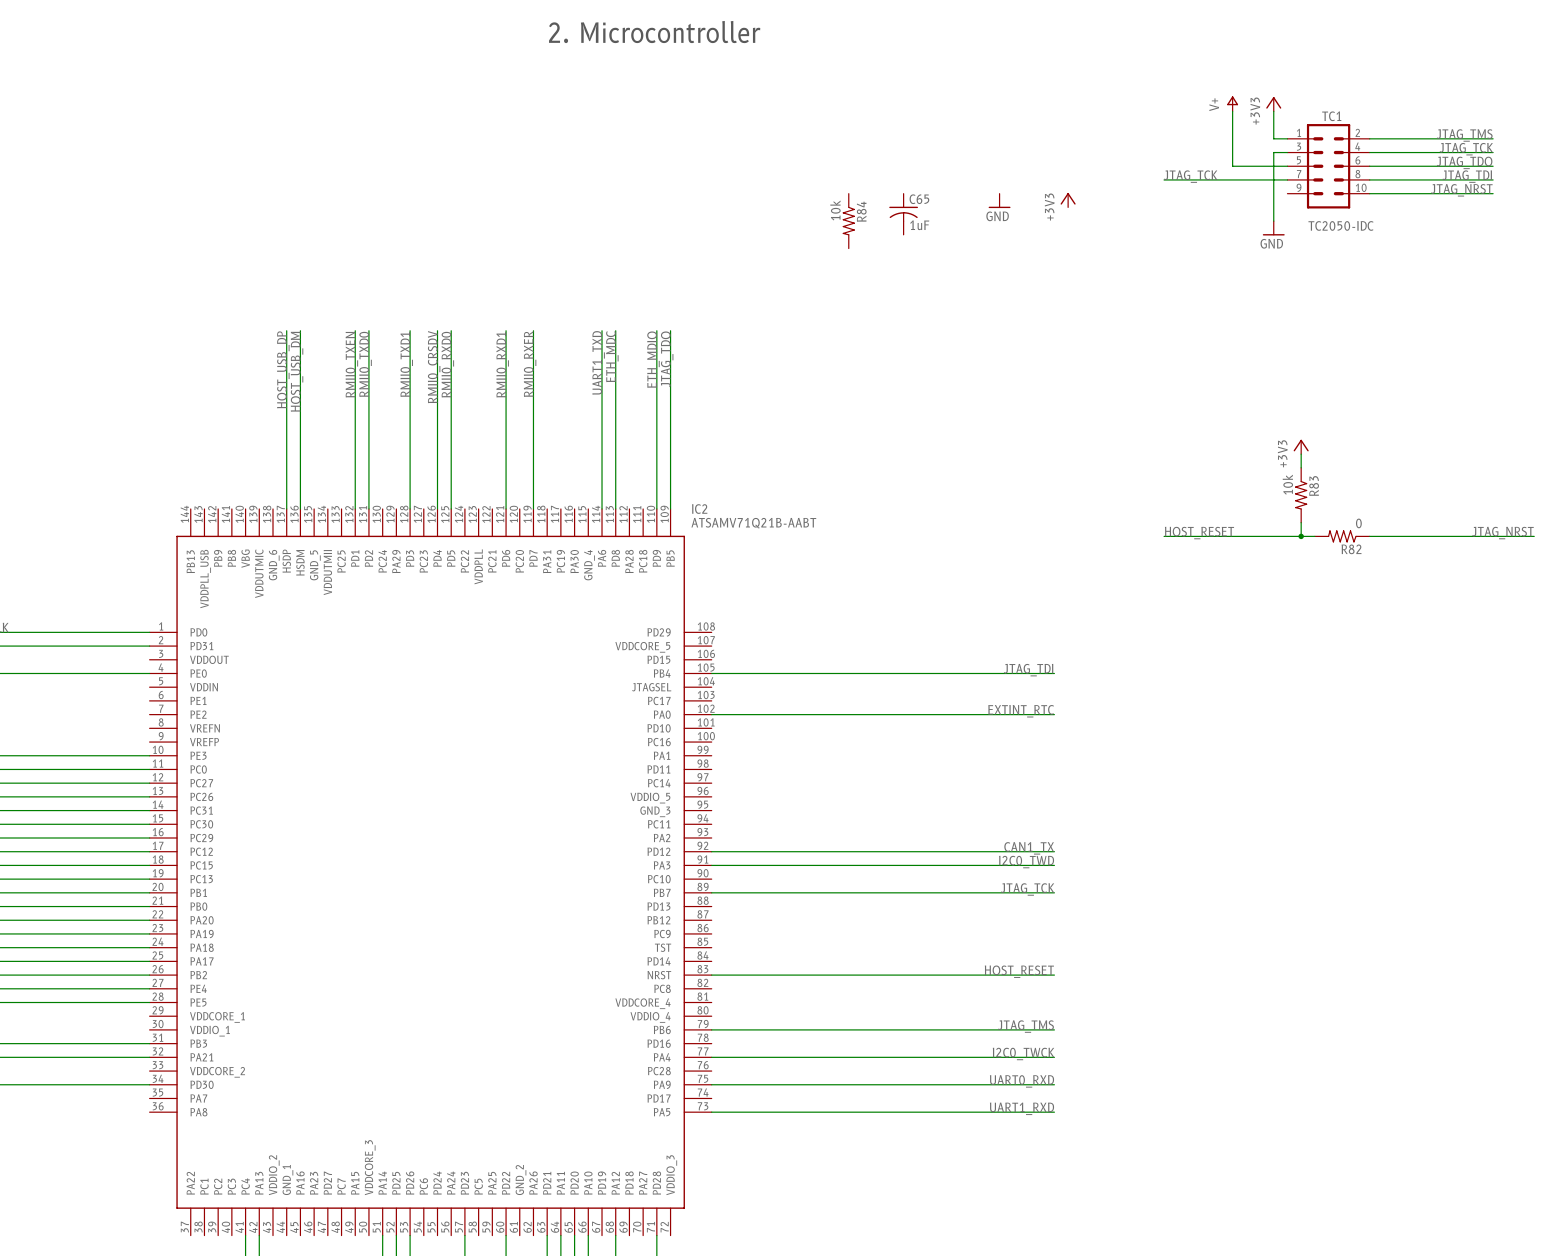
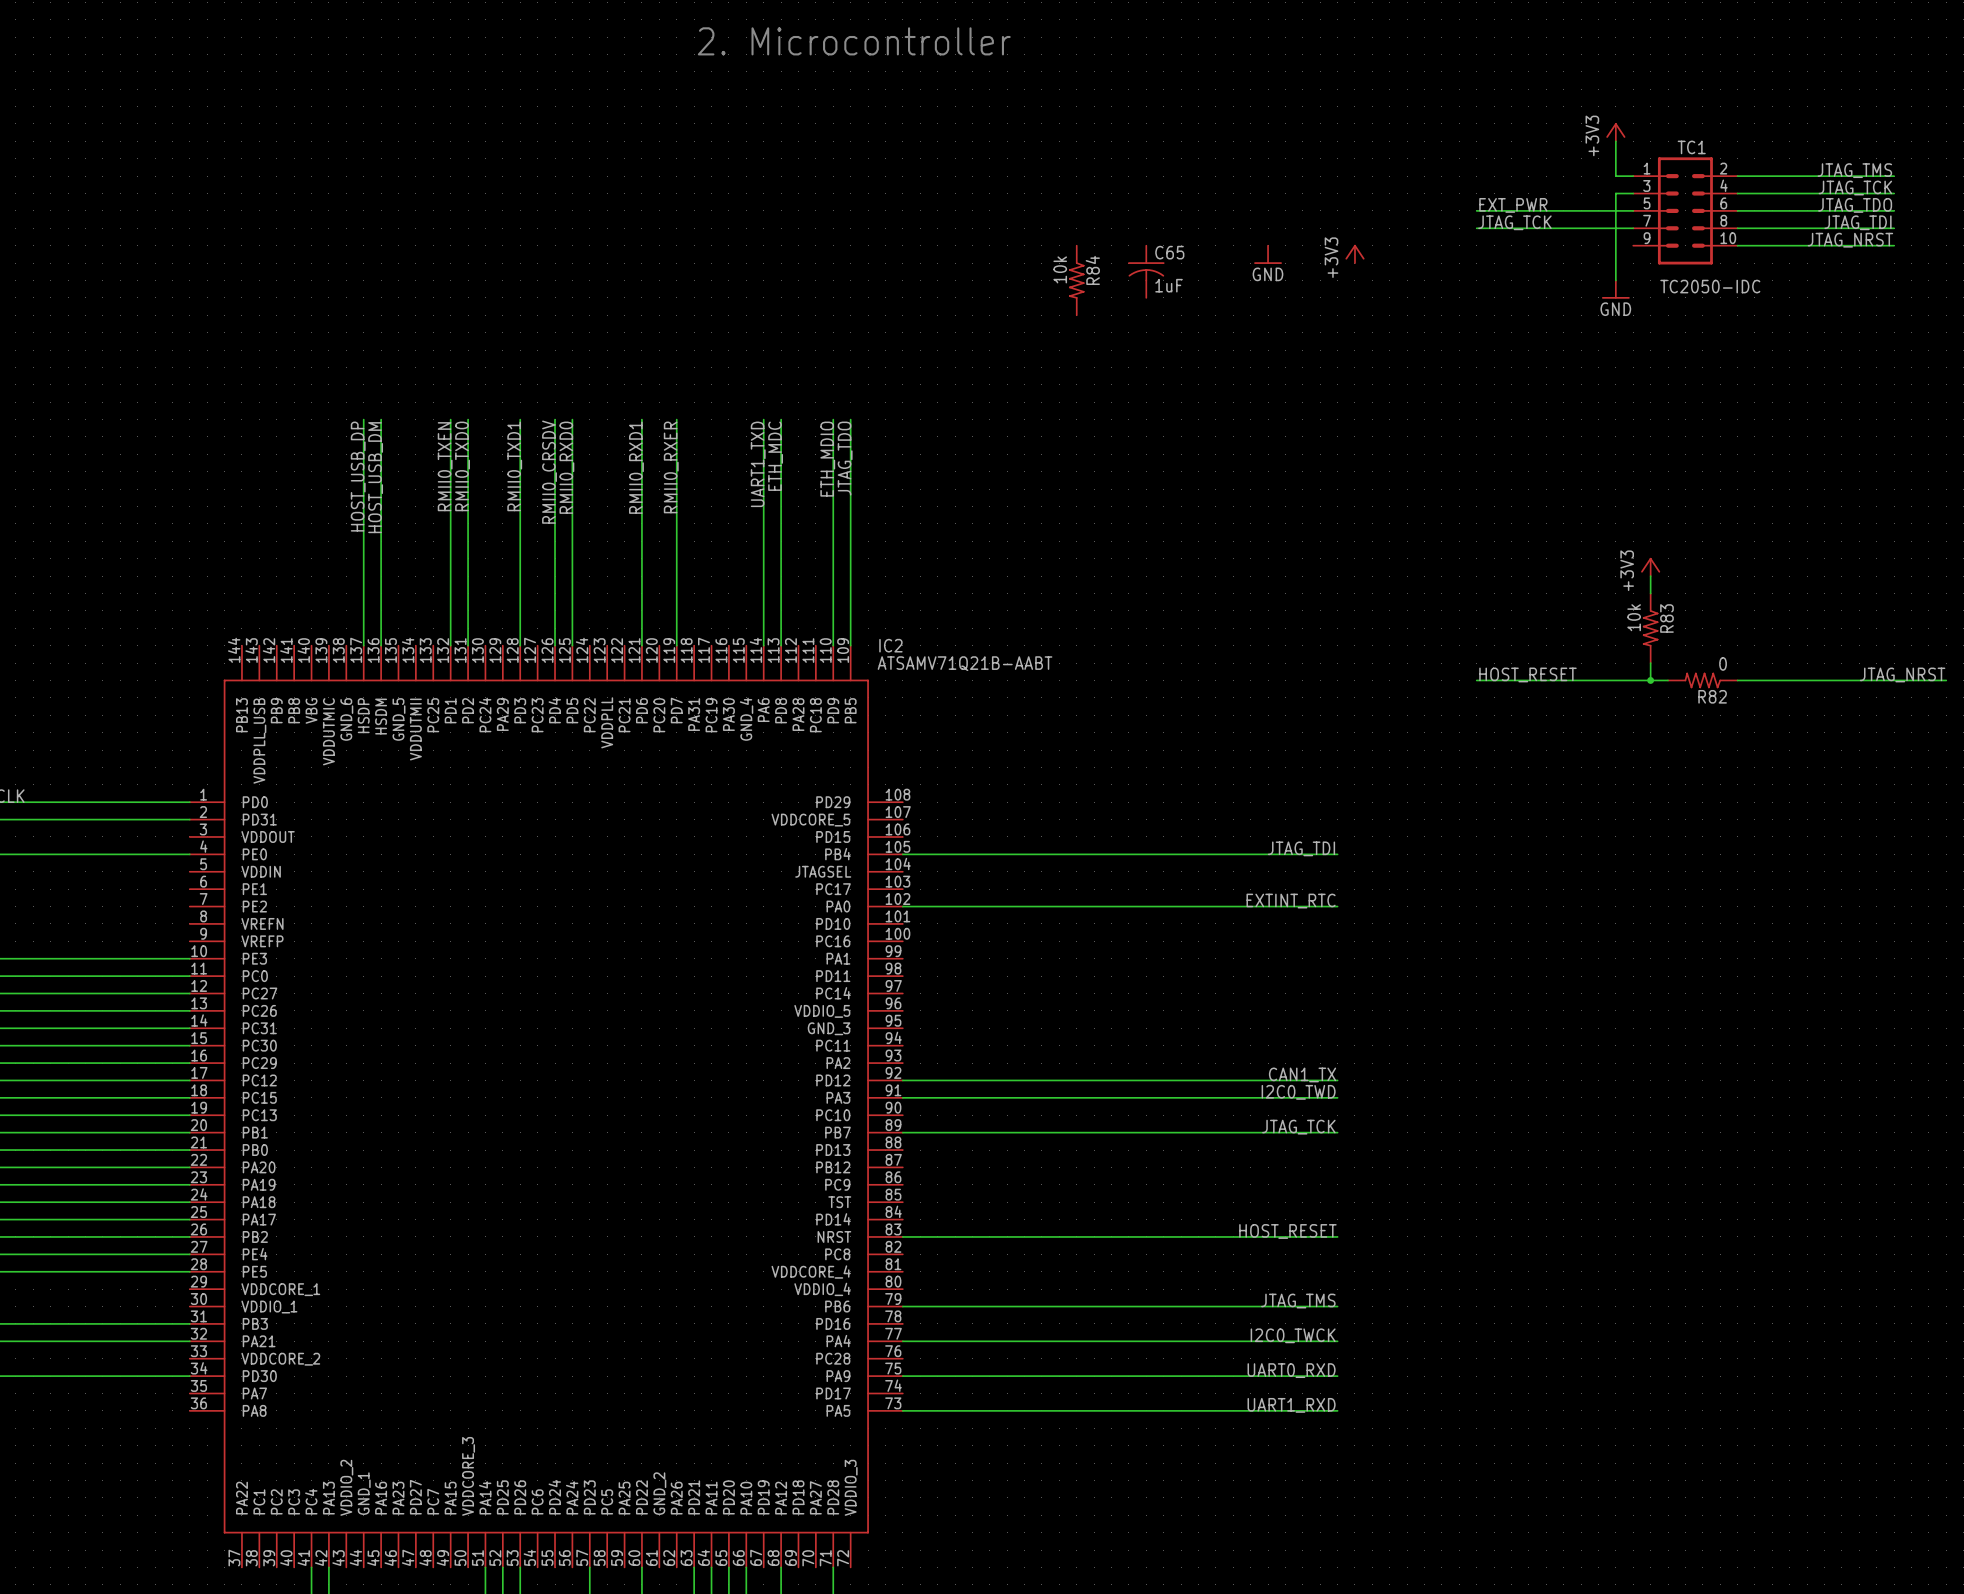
power symbol: V+ (1232, 103) -> none
wire: (1232, 111) (1232, 166) -> (1476, 210) (1563, 210)
label: none -> EXT_PWR (1513, 205)

